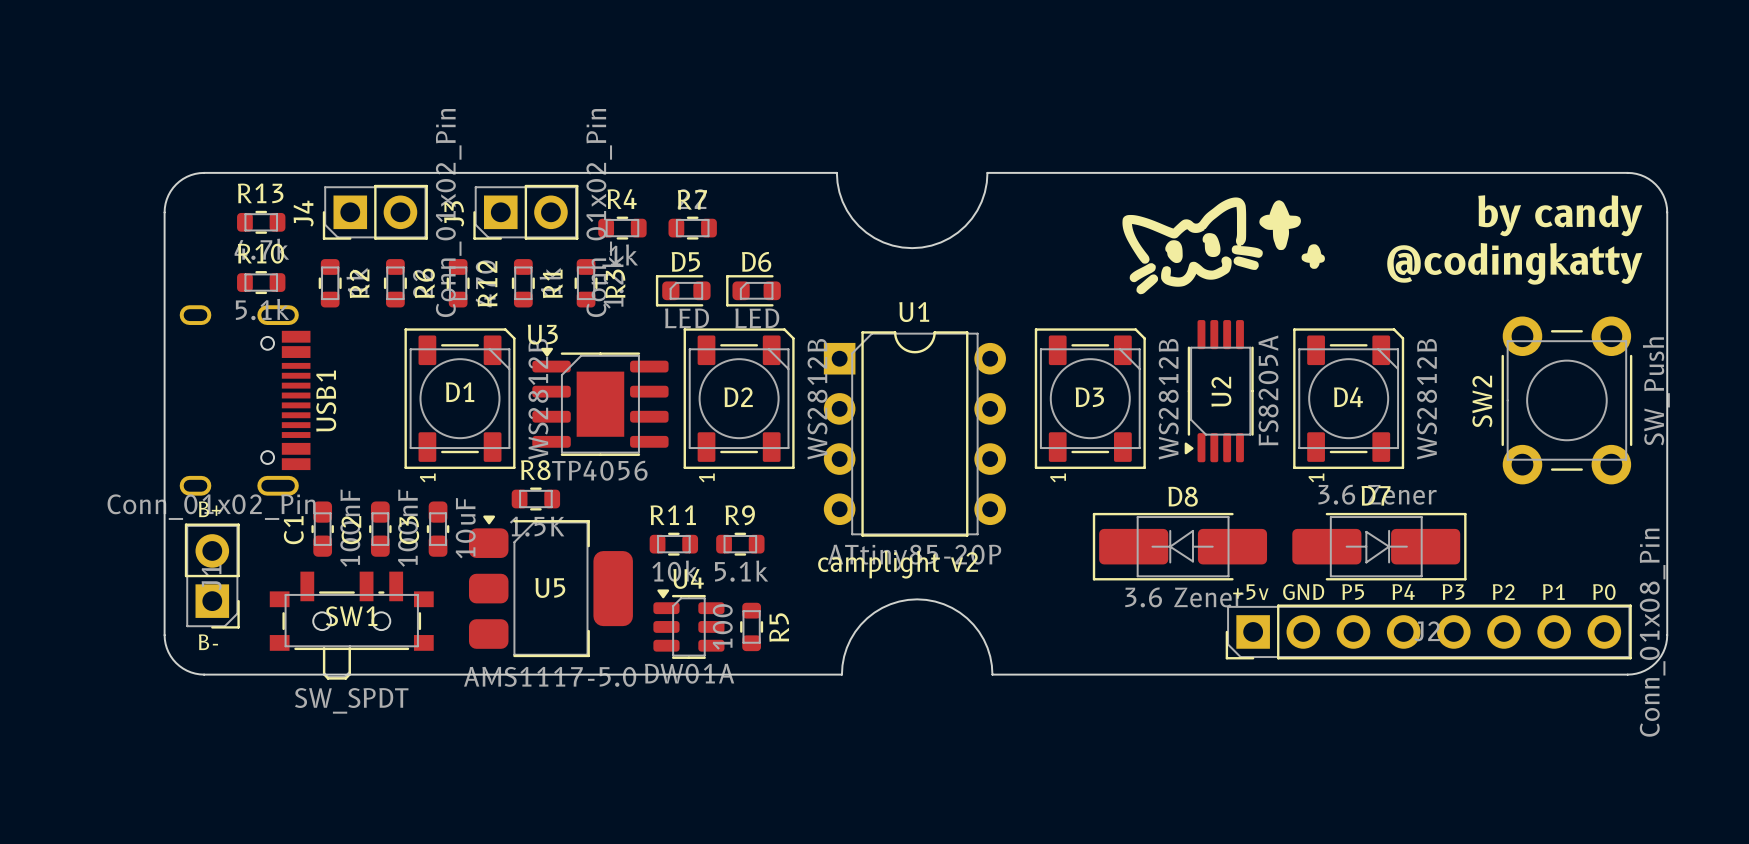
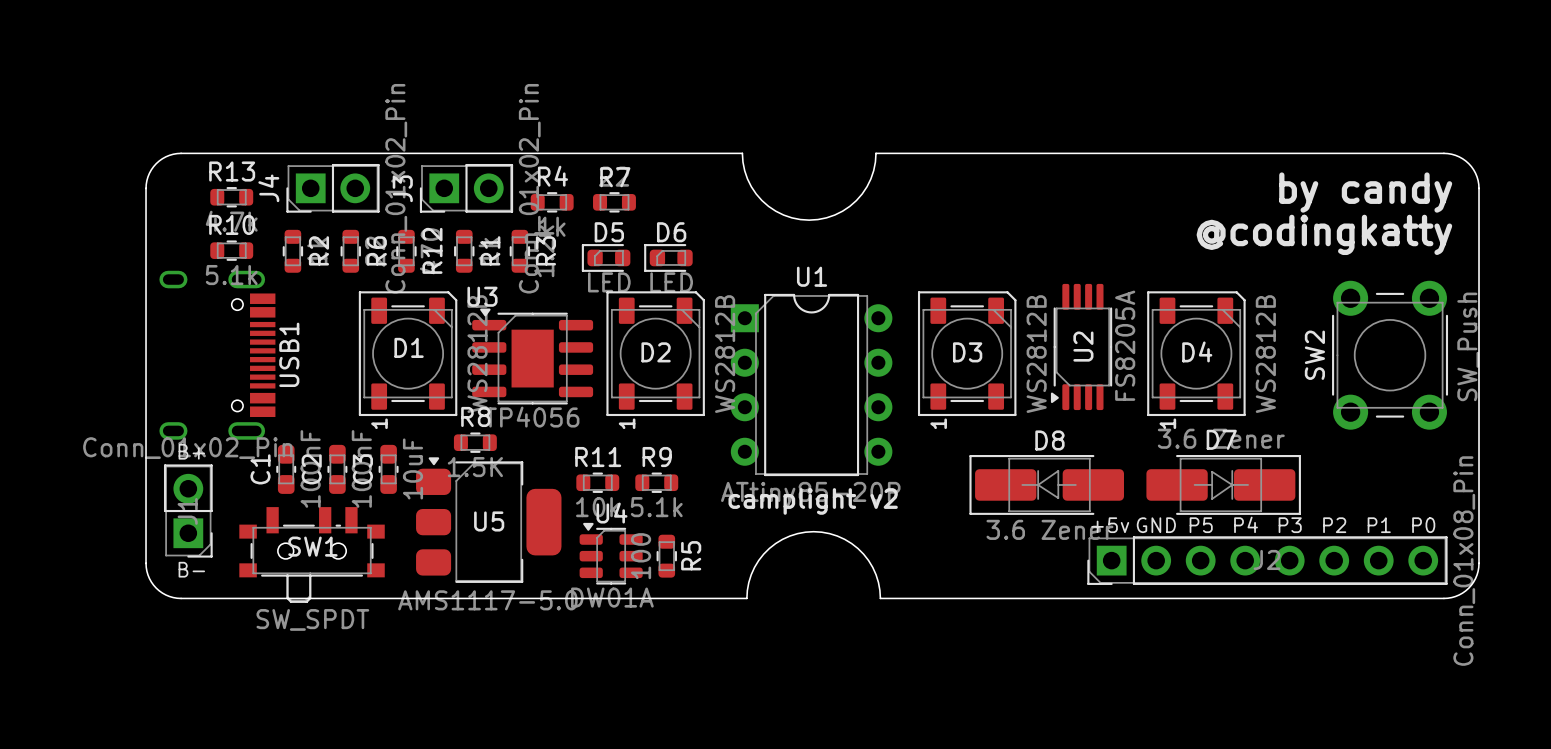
drawing: [1122, 197, 1325, 295] -> none

